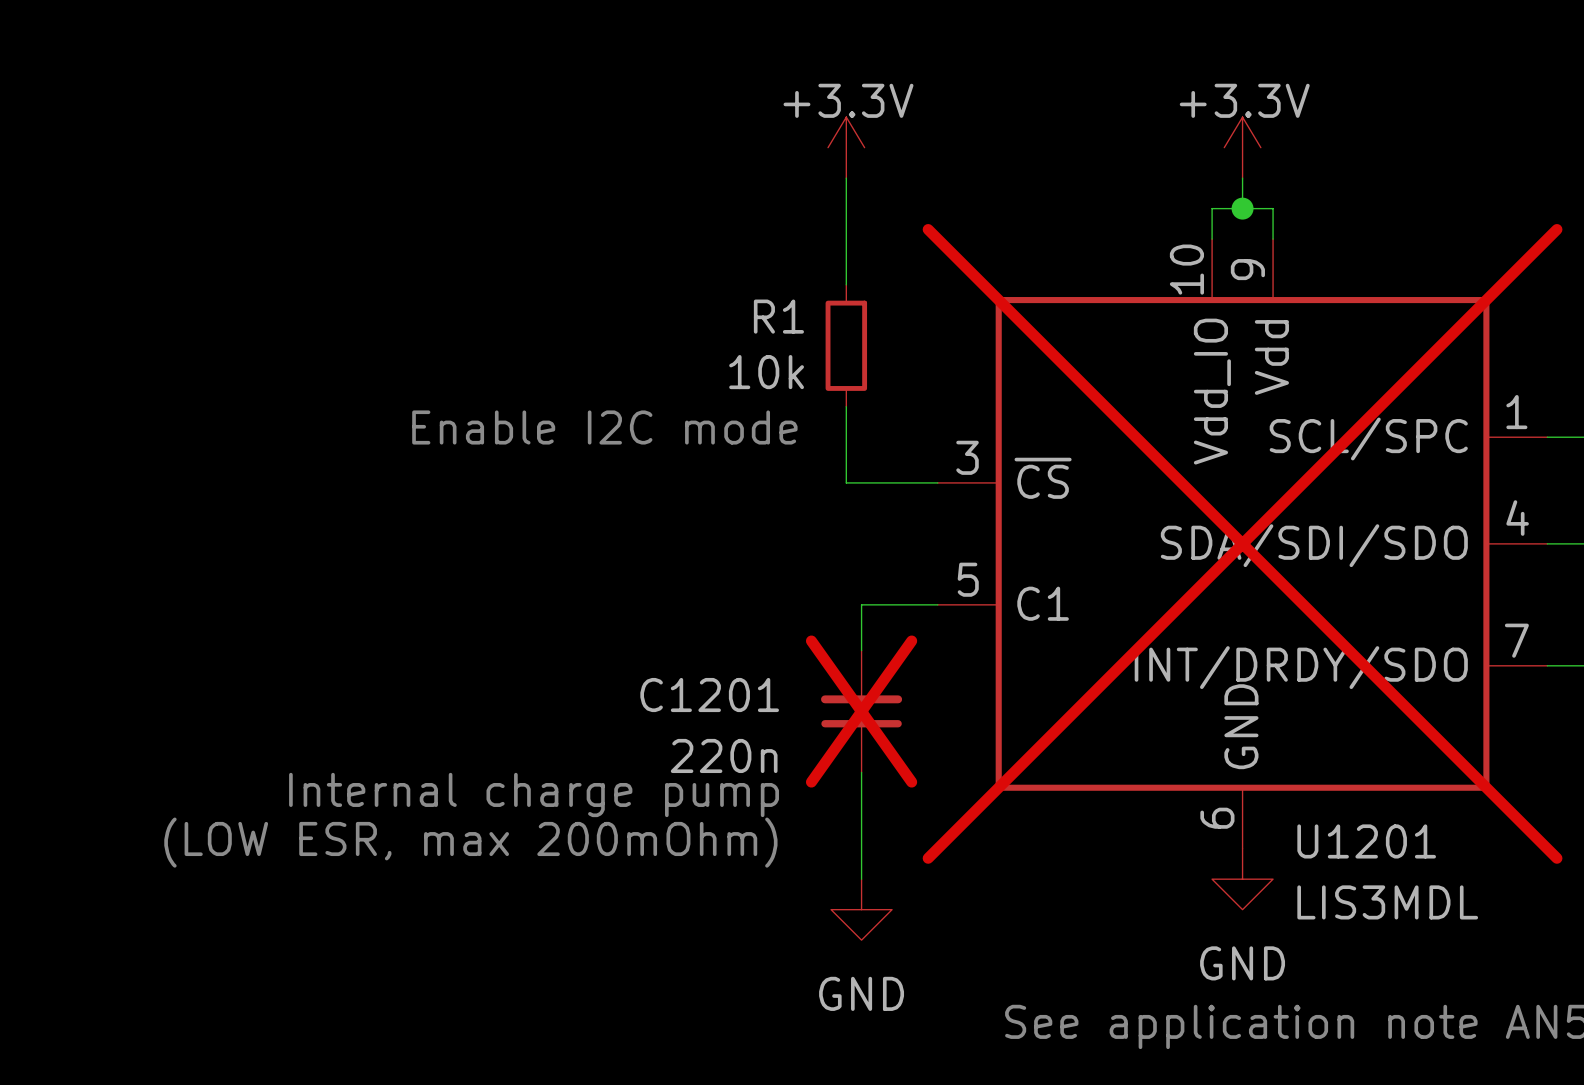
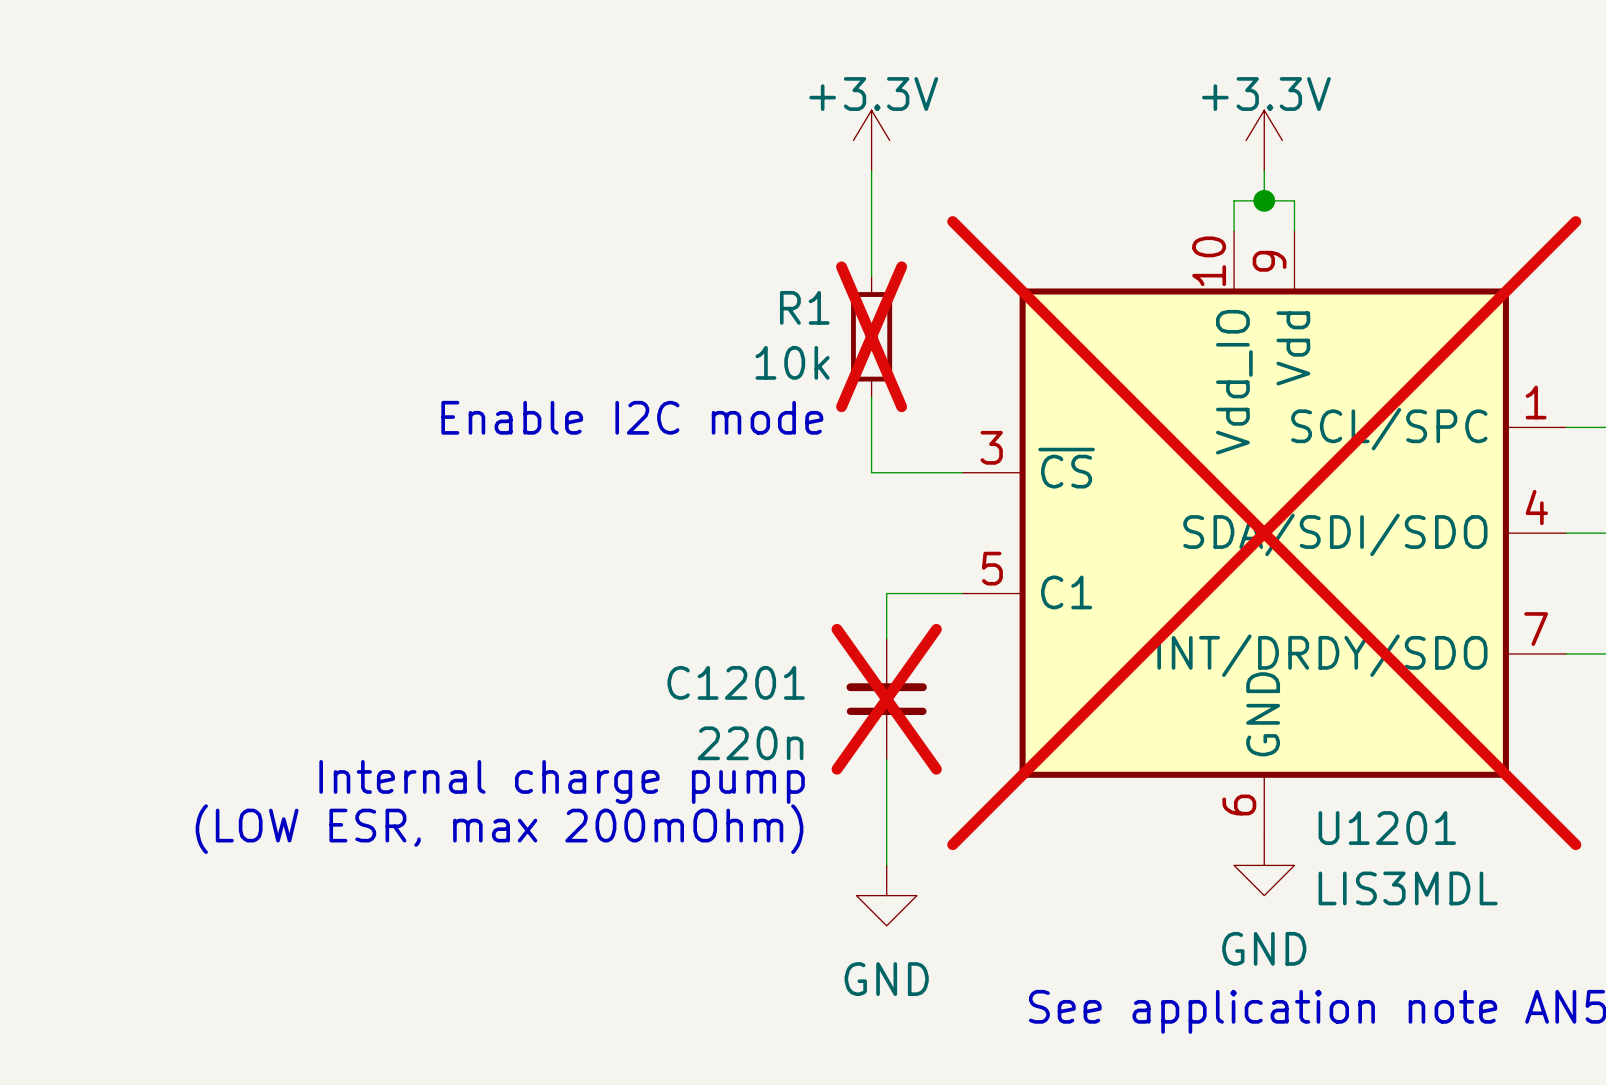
R1 do-not-place cross: none -> (871, 336)

